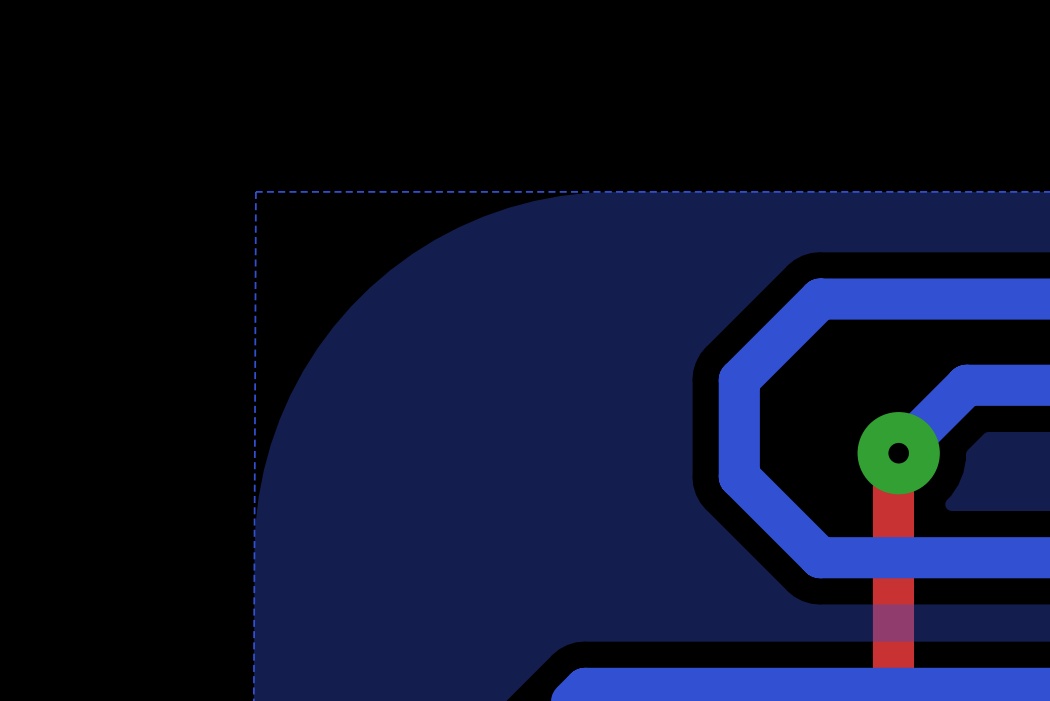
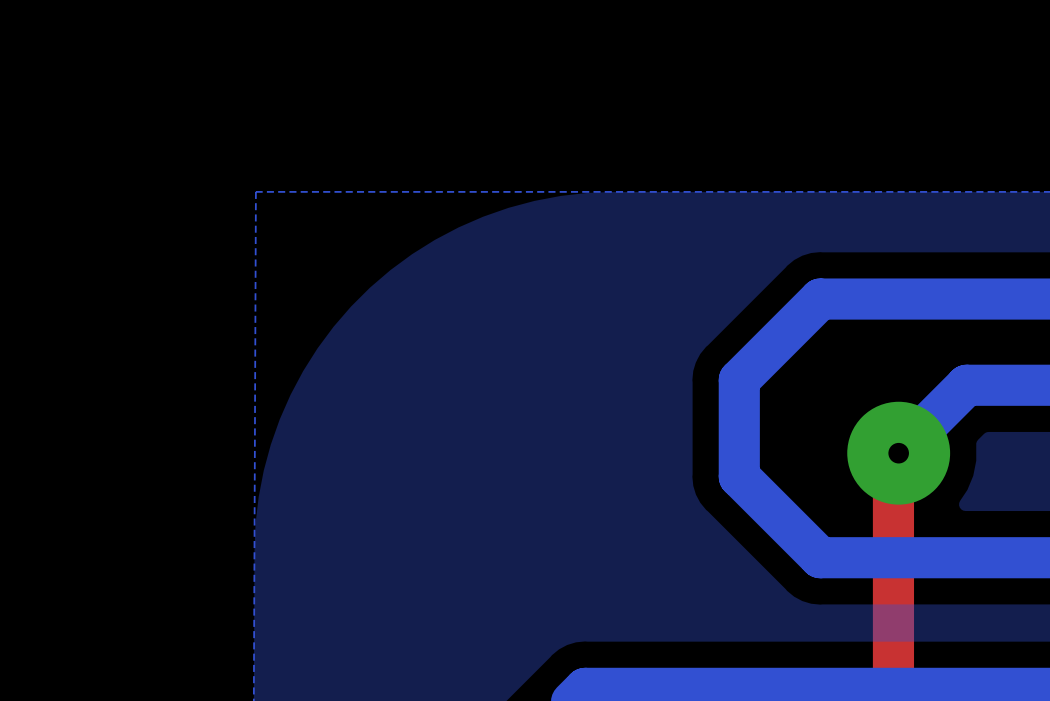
via size: [857, 412, 940, 495] -> [847, 401, 951, 505]

